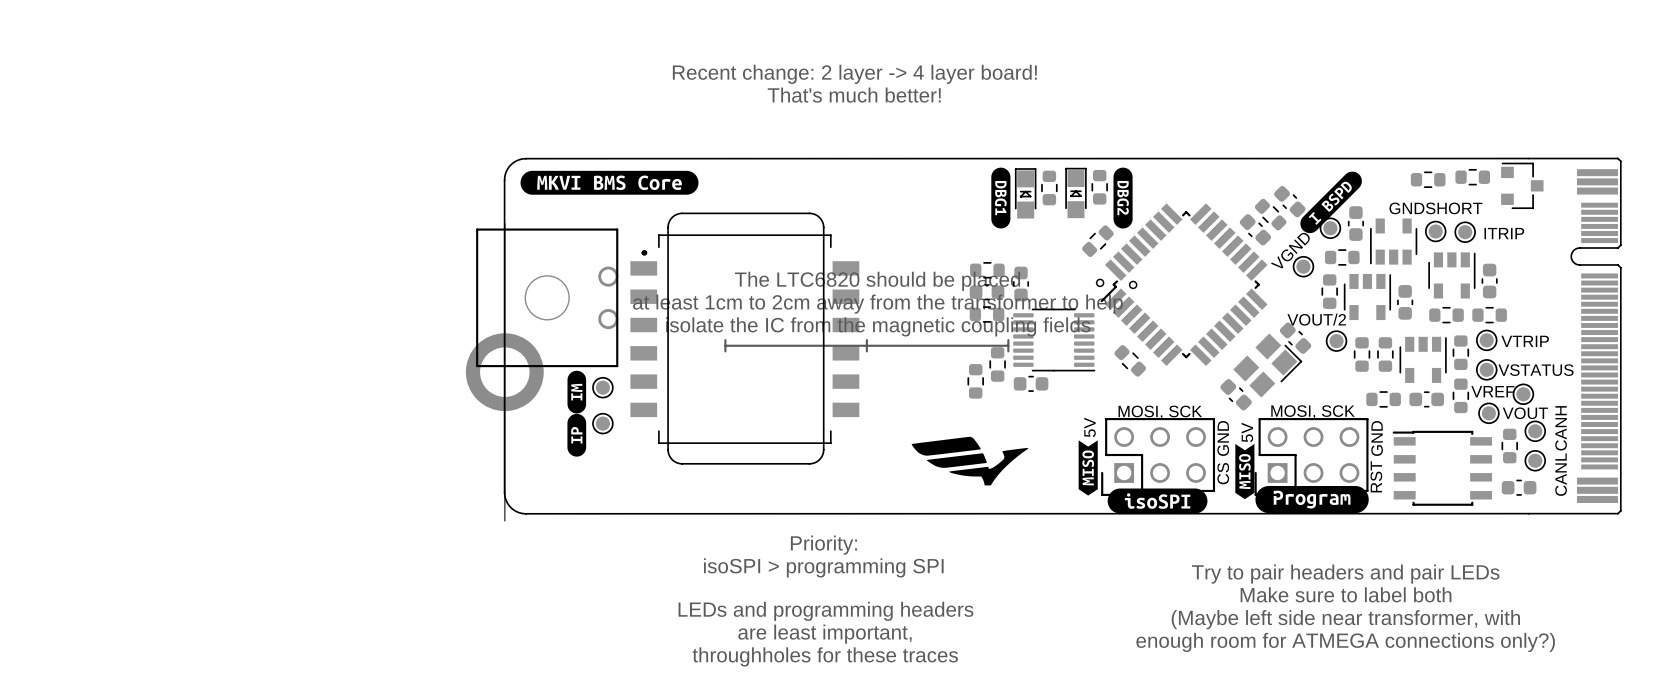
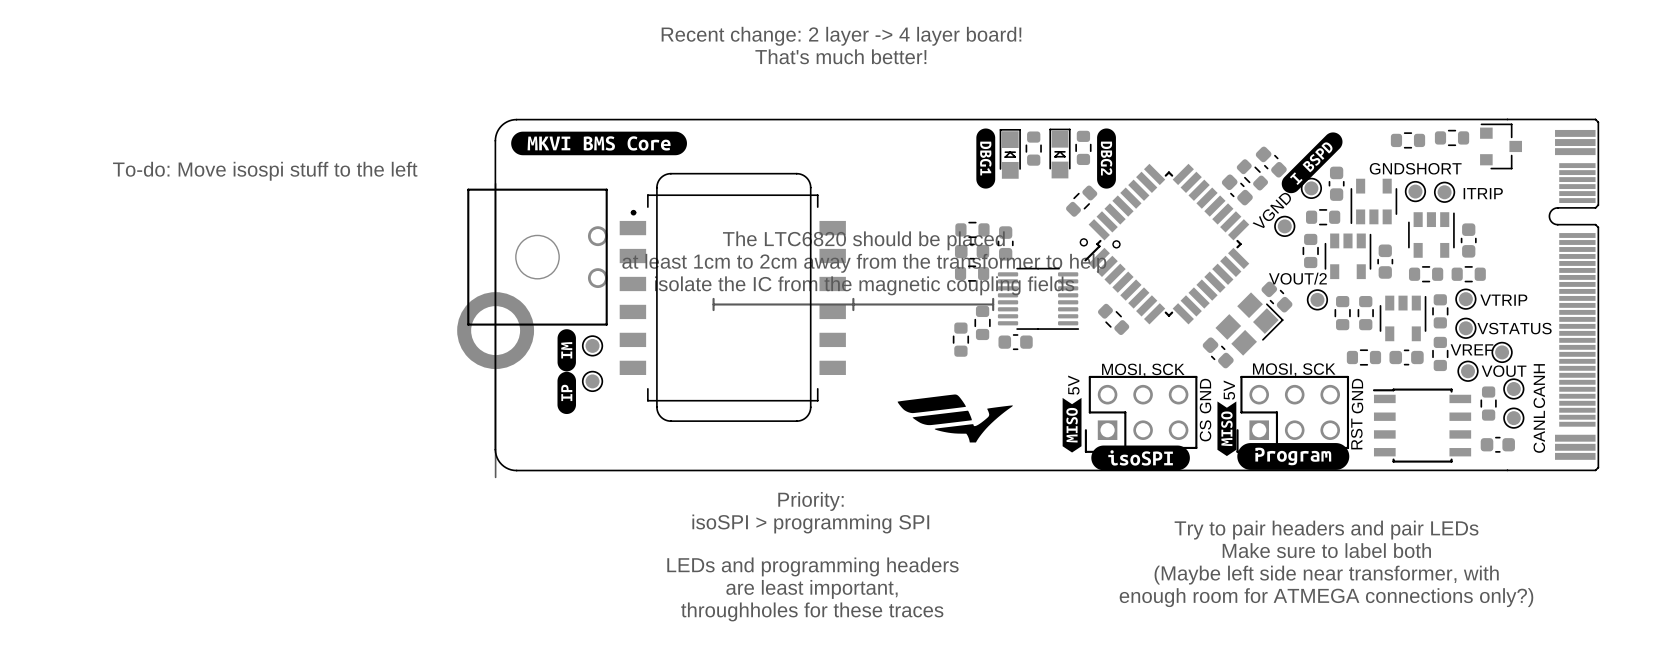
text: none -> To-do: Move isospi stuff to the left (265, 171)

